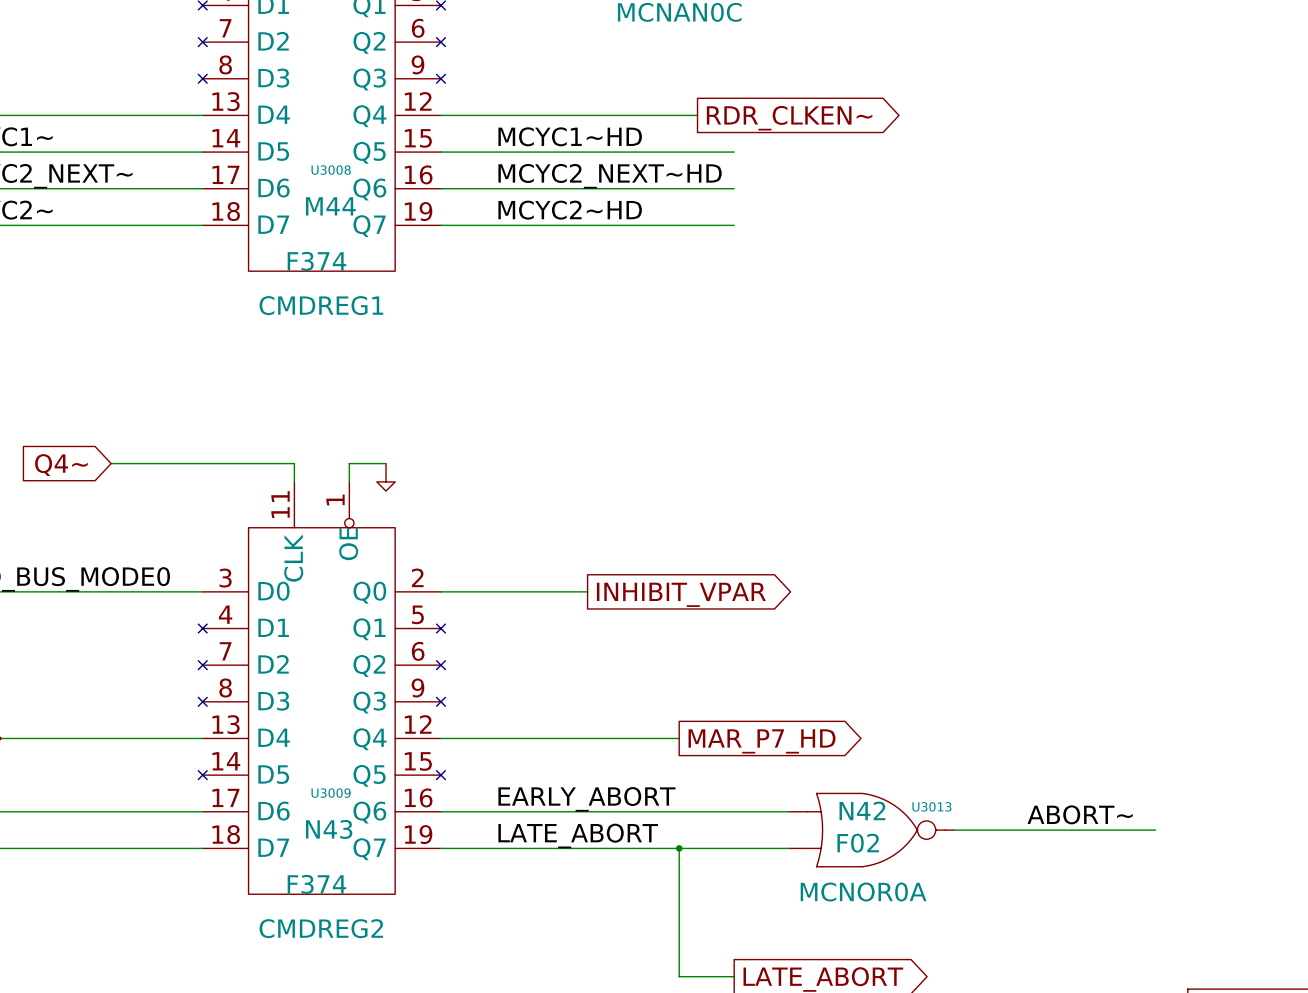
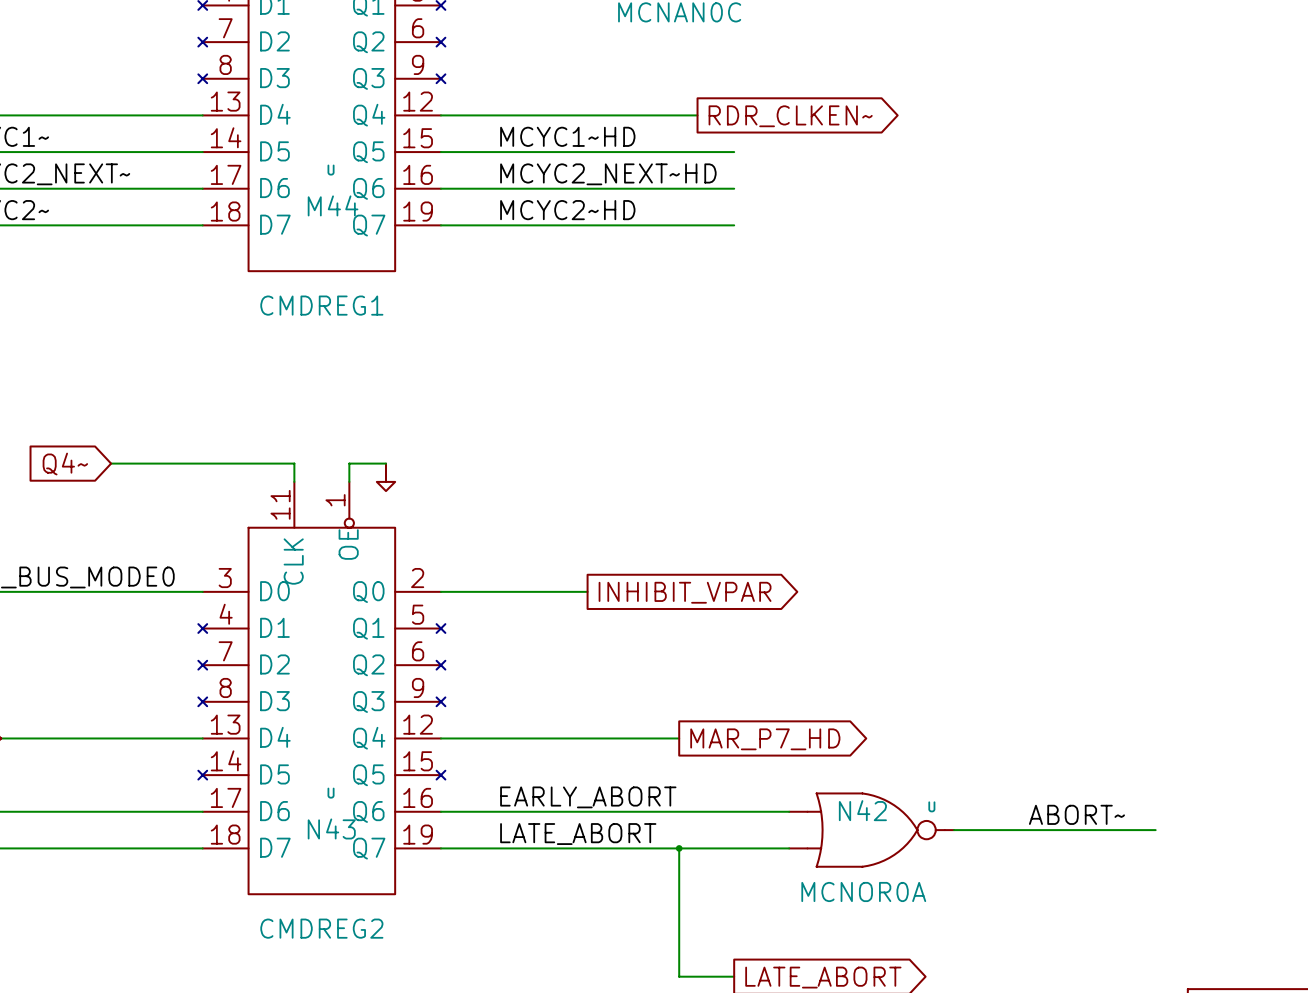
U3008 name: U3008 (331, 170) -> U (331, 170)
U3008 value: F374 (316, 261) -> none
U3009 name: U3009 (331, 793) -> U (331, 793)
U3013 name: U3013 (931, 806) -> U (931, 806)
U3013 value: F02 (858, 843) -> none
U3009 value: F374 (316, 884) -> none

